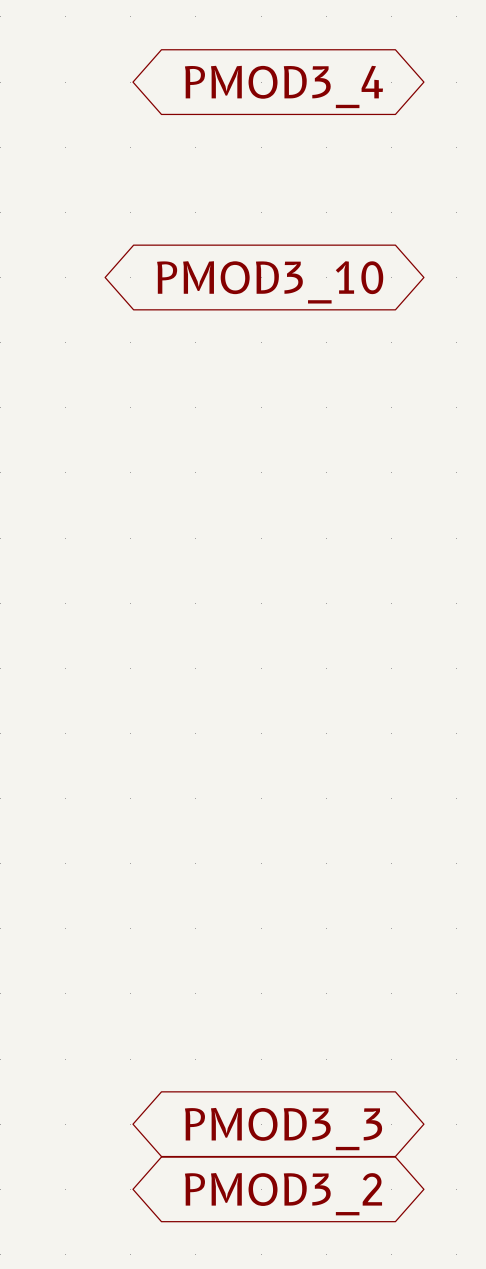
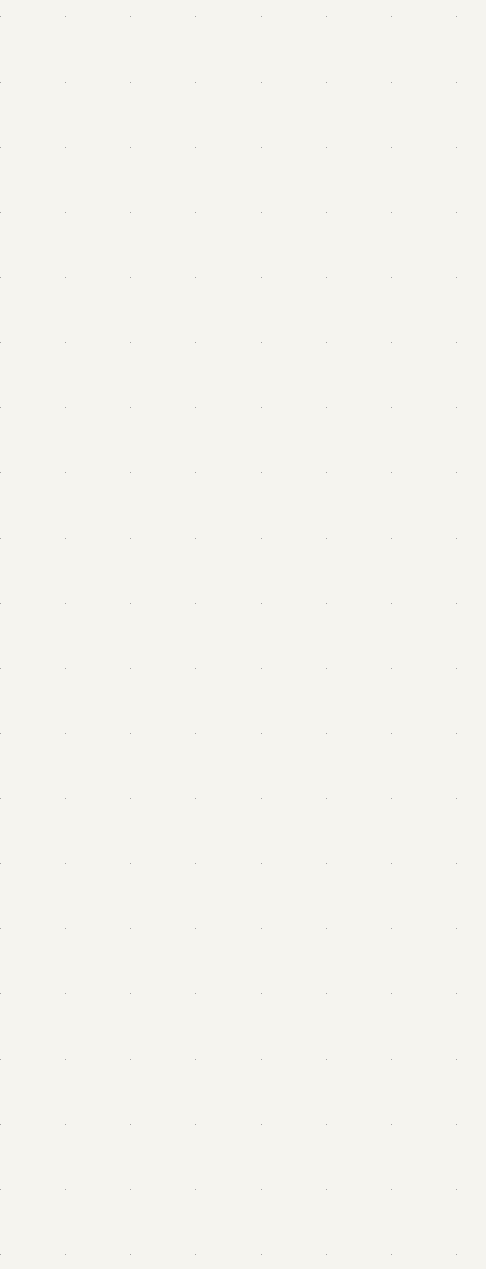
global label: PMOD3_4 (283, 86) -> none
global label: PMOD3_10 (270, 282) -> none
global label: PMOD3_3 (283, 1129) -> none
global label: PMOD3_2 (283, 1194) -> none

